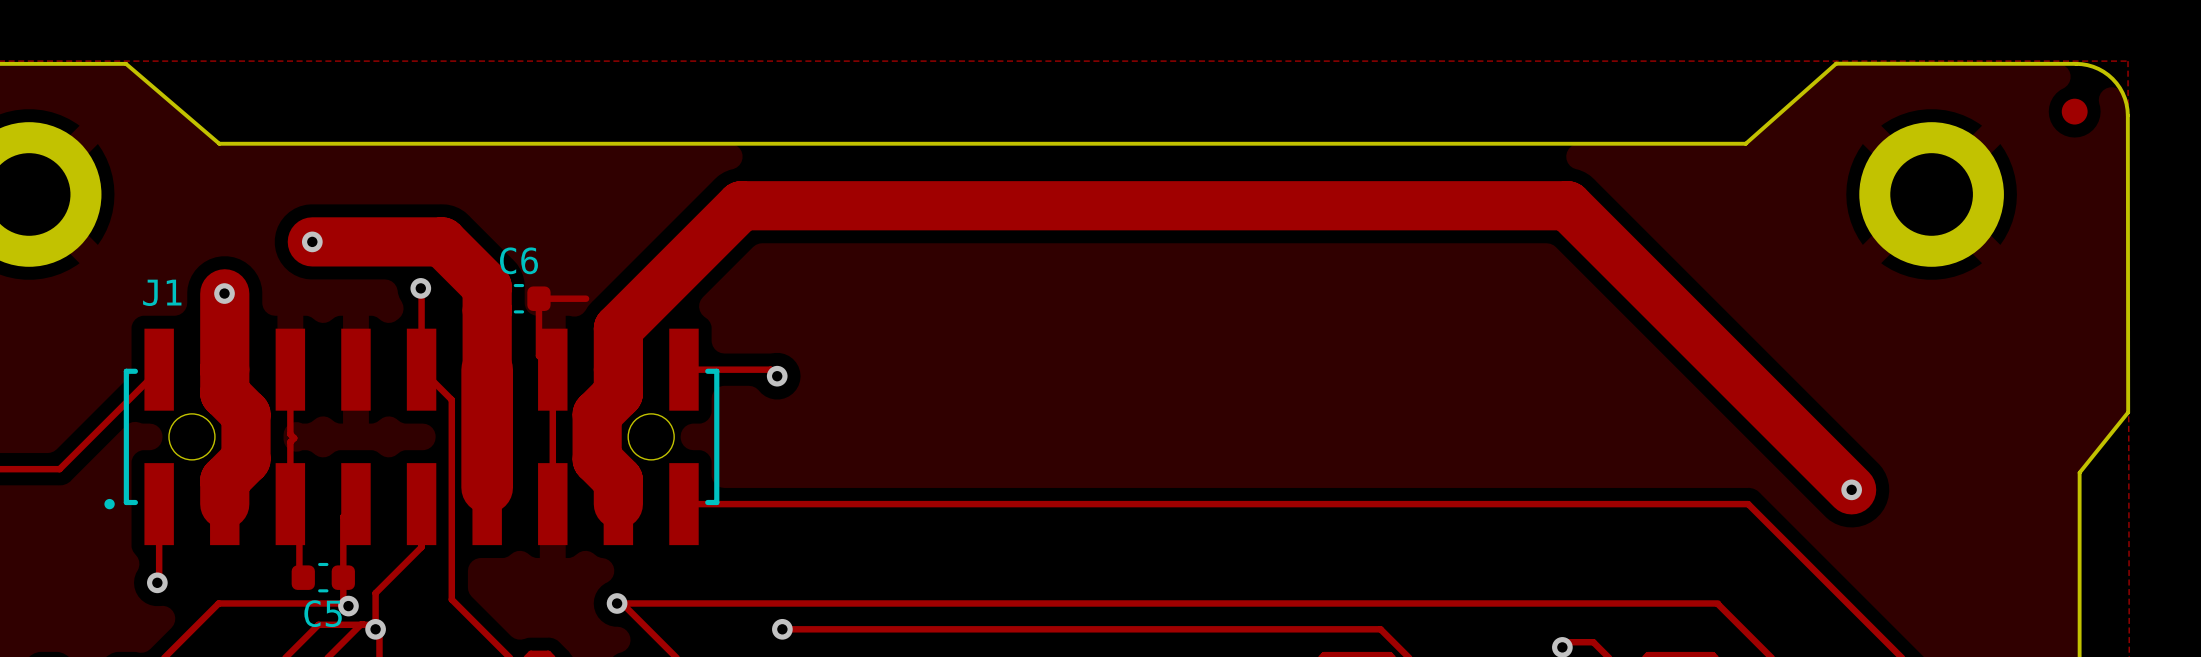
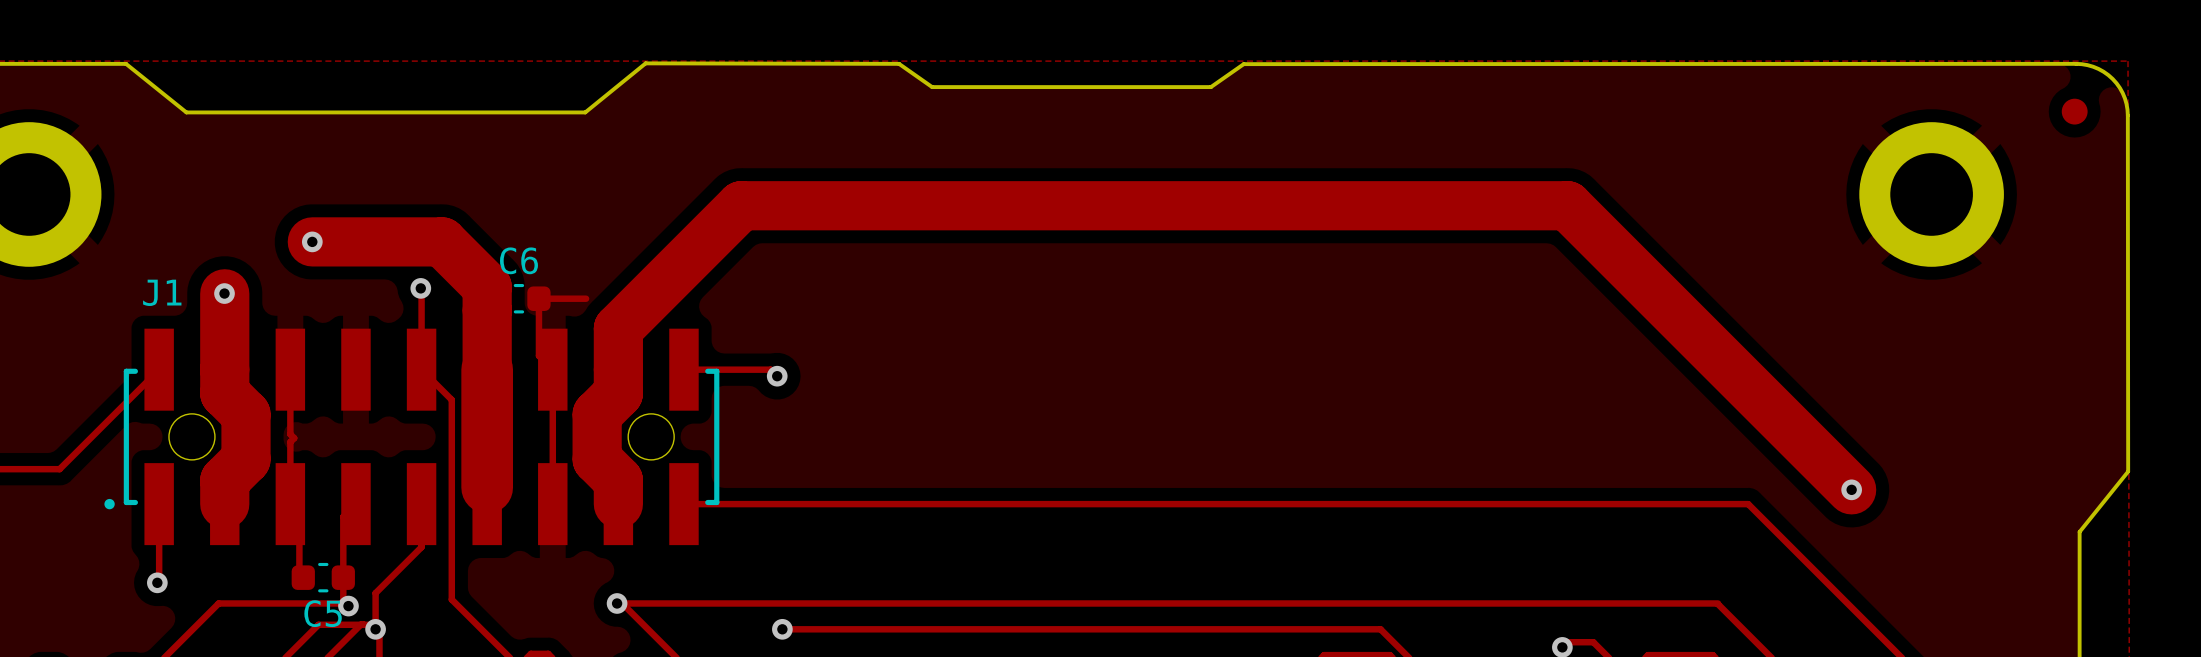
board edge: (126, 63) (219, 143) (1745, 143) (1836, 63) (2076, 63) -> (126, 63) (186, 112) (585, 112) (645, 63) (899, 63) (932, 87) (1210, 87) (1243, 64) (2076, 63)
board edge: (2127, 115) (2128, 412) (2079, 472) (2079, 531) -> (2127, 115) (2128, 471) (2079, 531)

